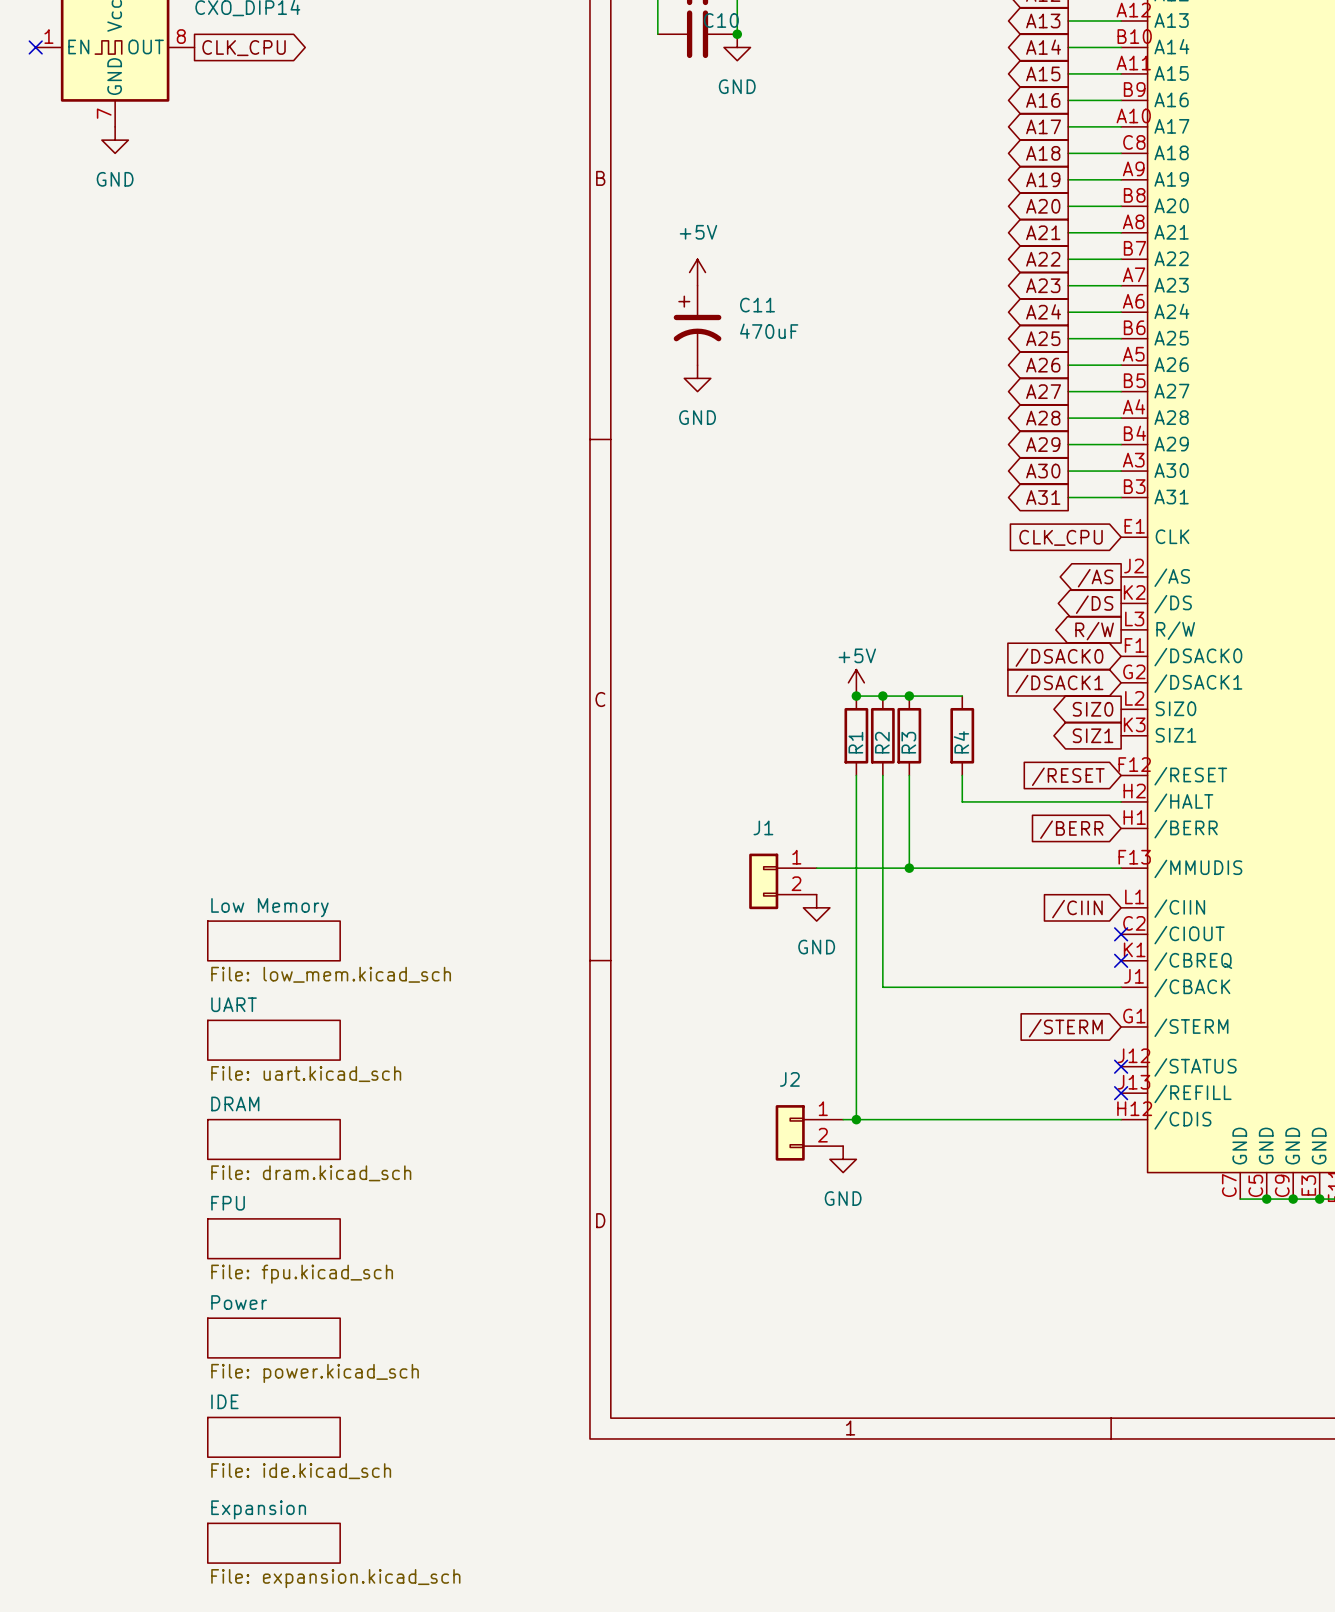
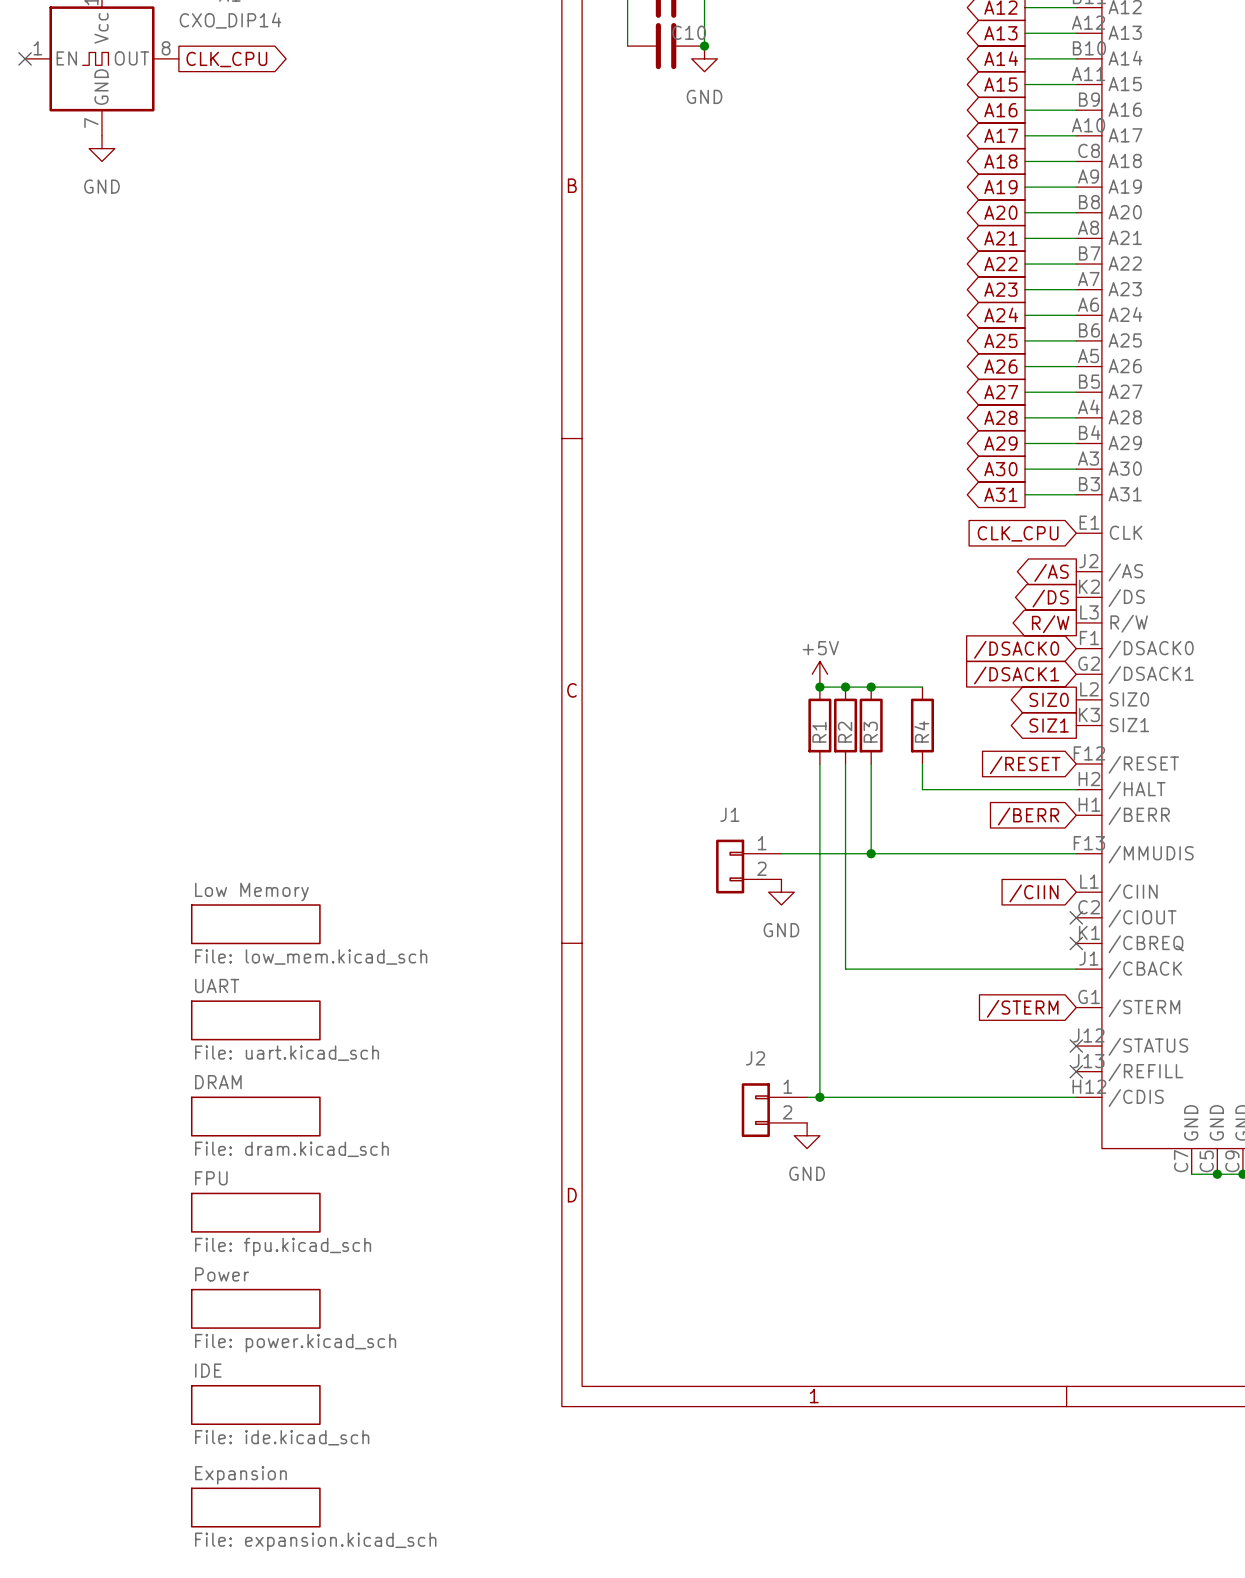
power symbol: +5V (697, 272) -> none
C11: 470uF (697, 325) -> none
power symbol: GND (697, 378) -> none

